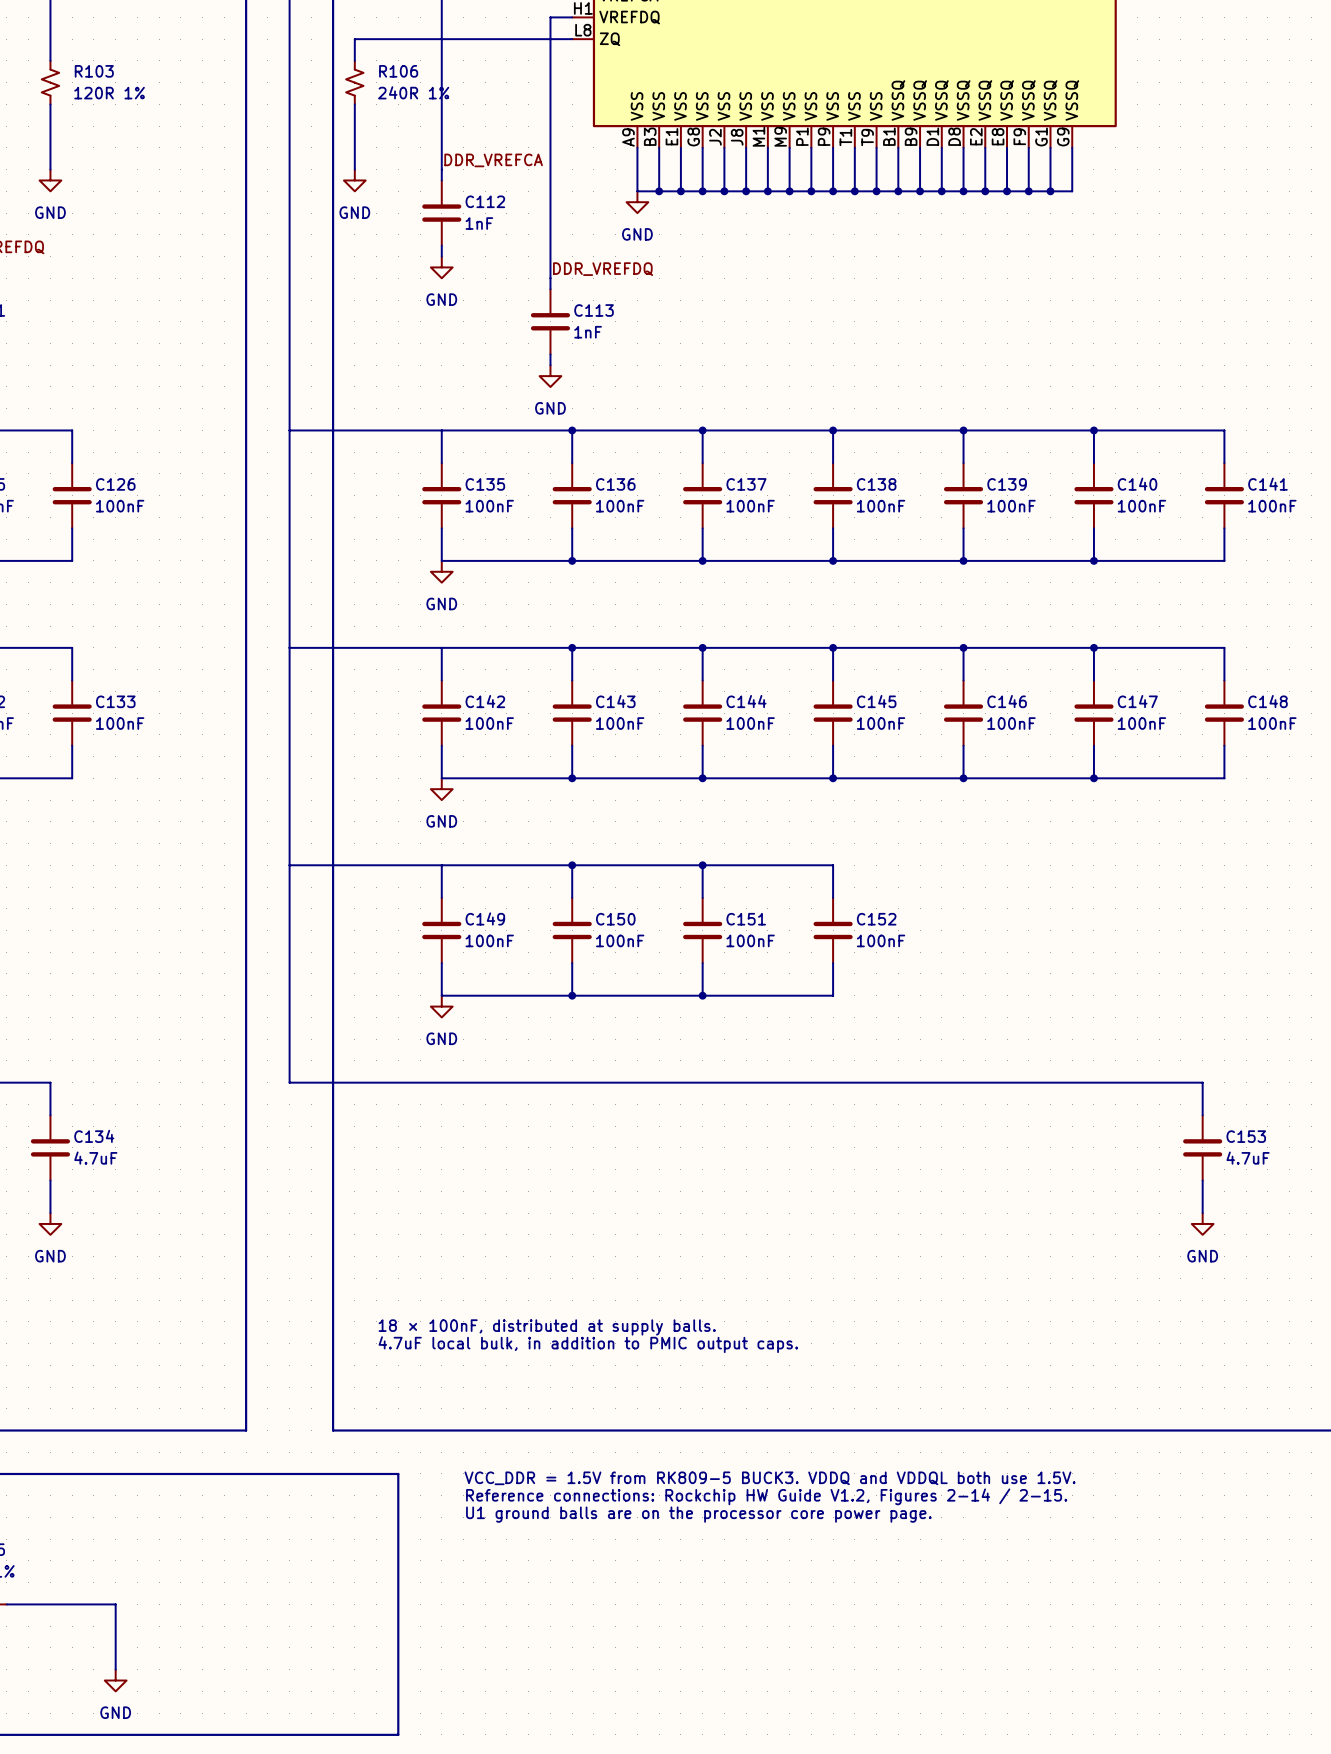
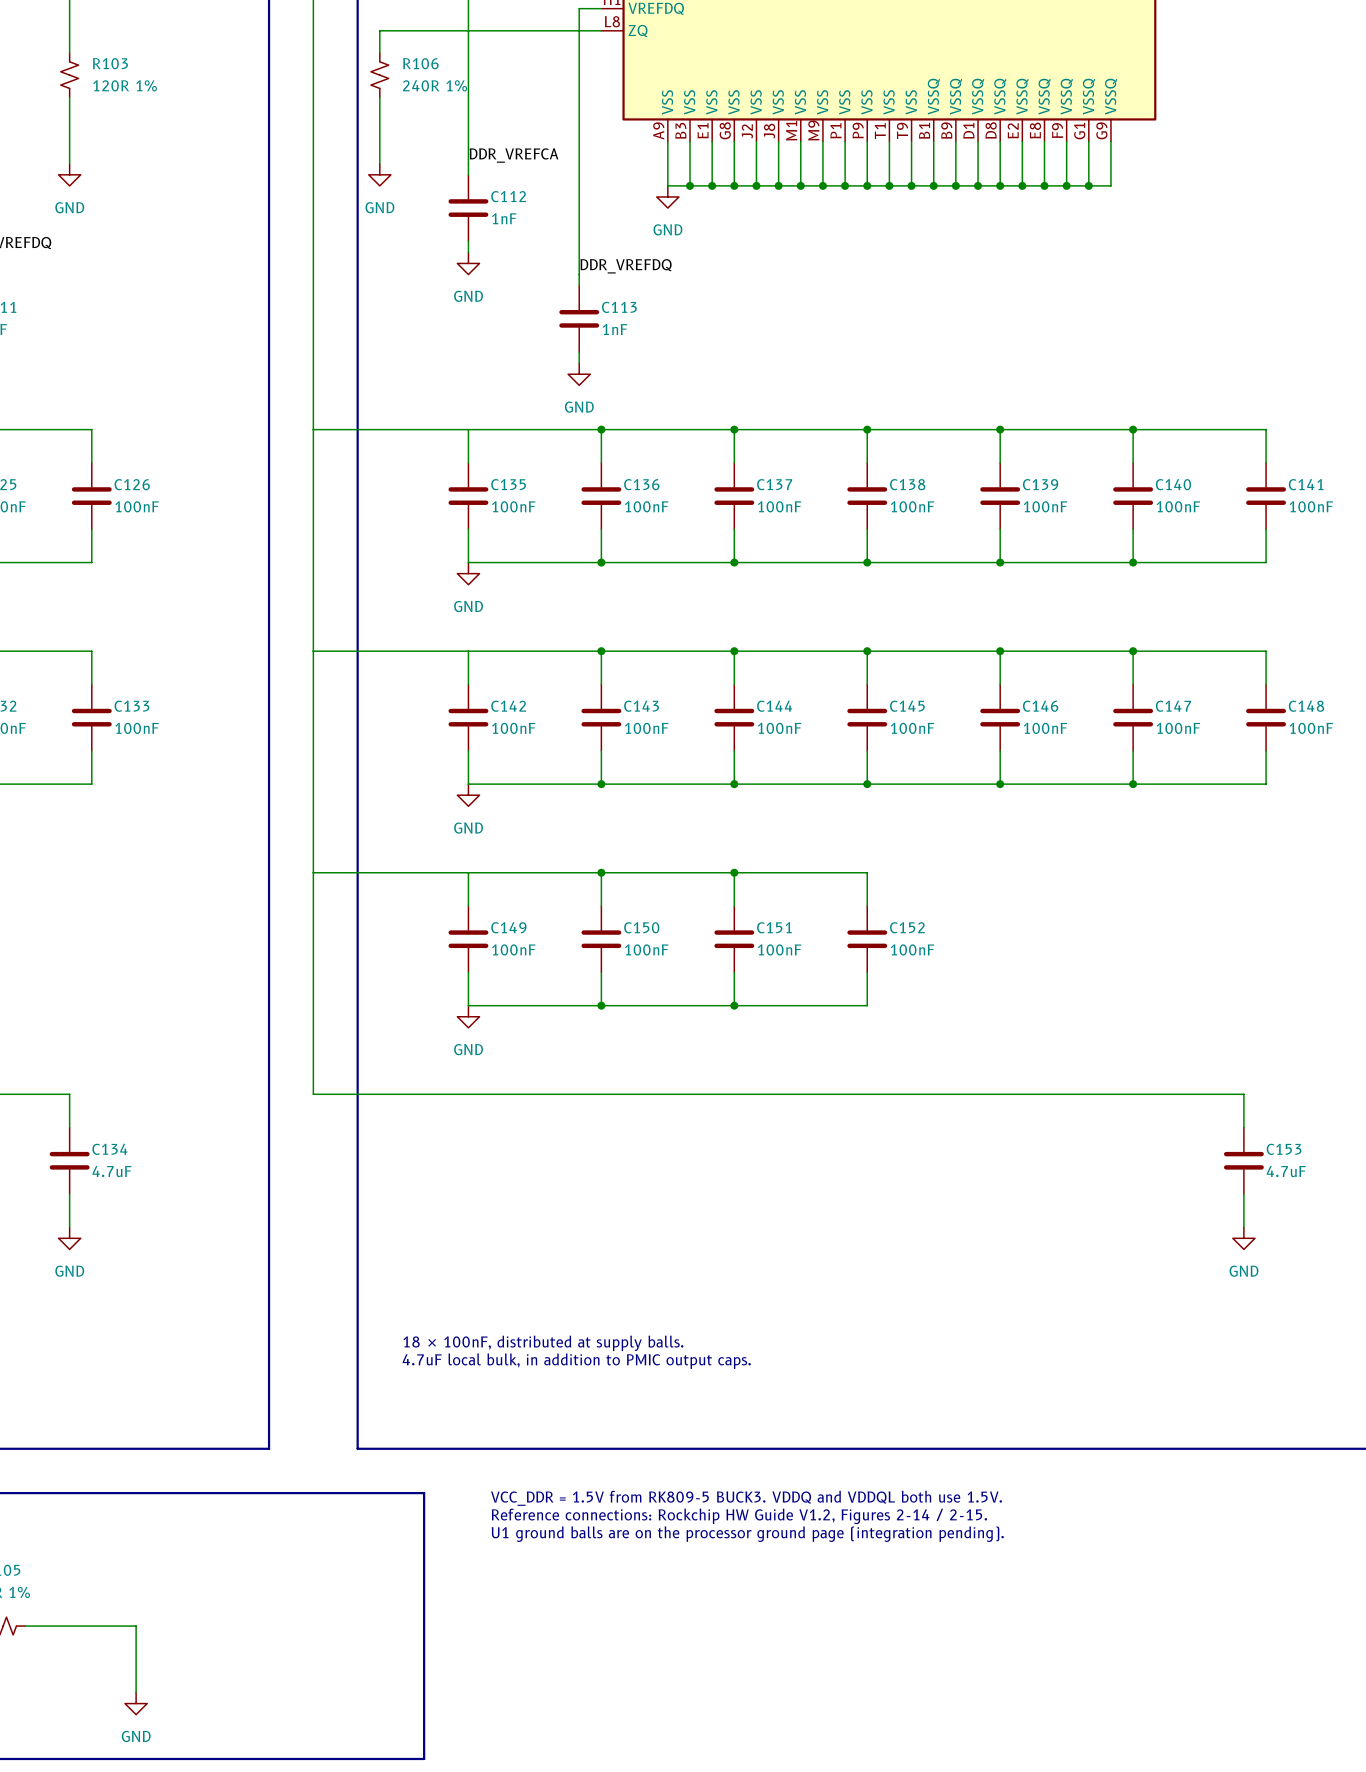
text: U1 ground balls are on the processor core power page. (698, 1514) -> U1 ground balls are on the processor ground page (integration pending). (747, 1534)

